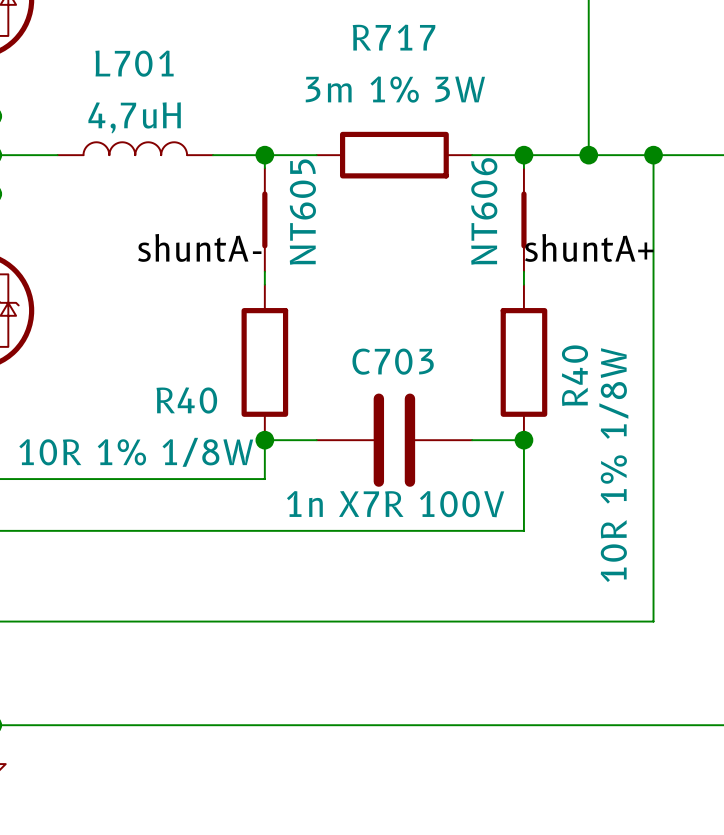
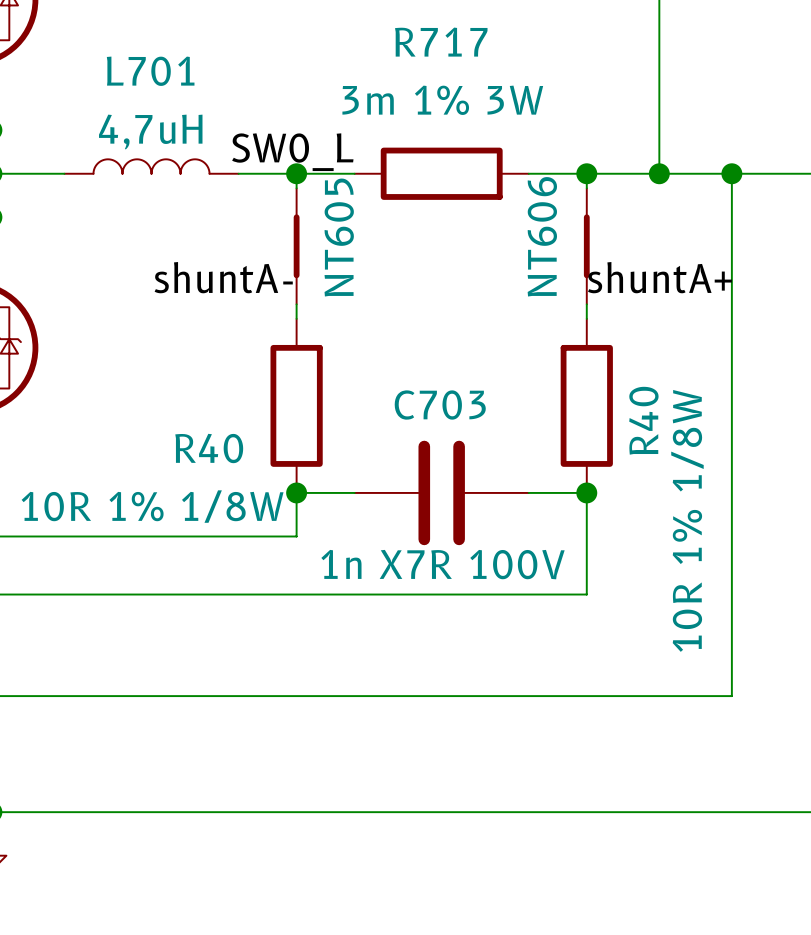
label: none -> SW0_L (292, 152)

